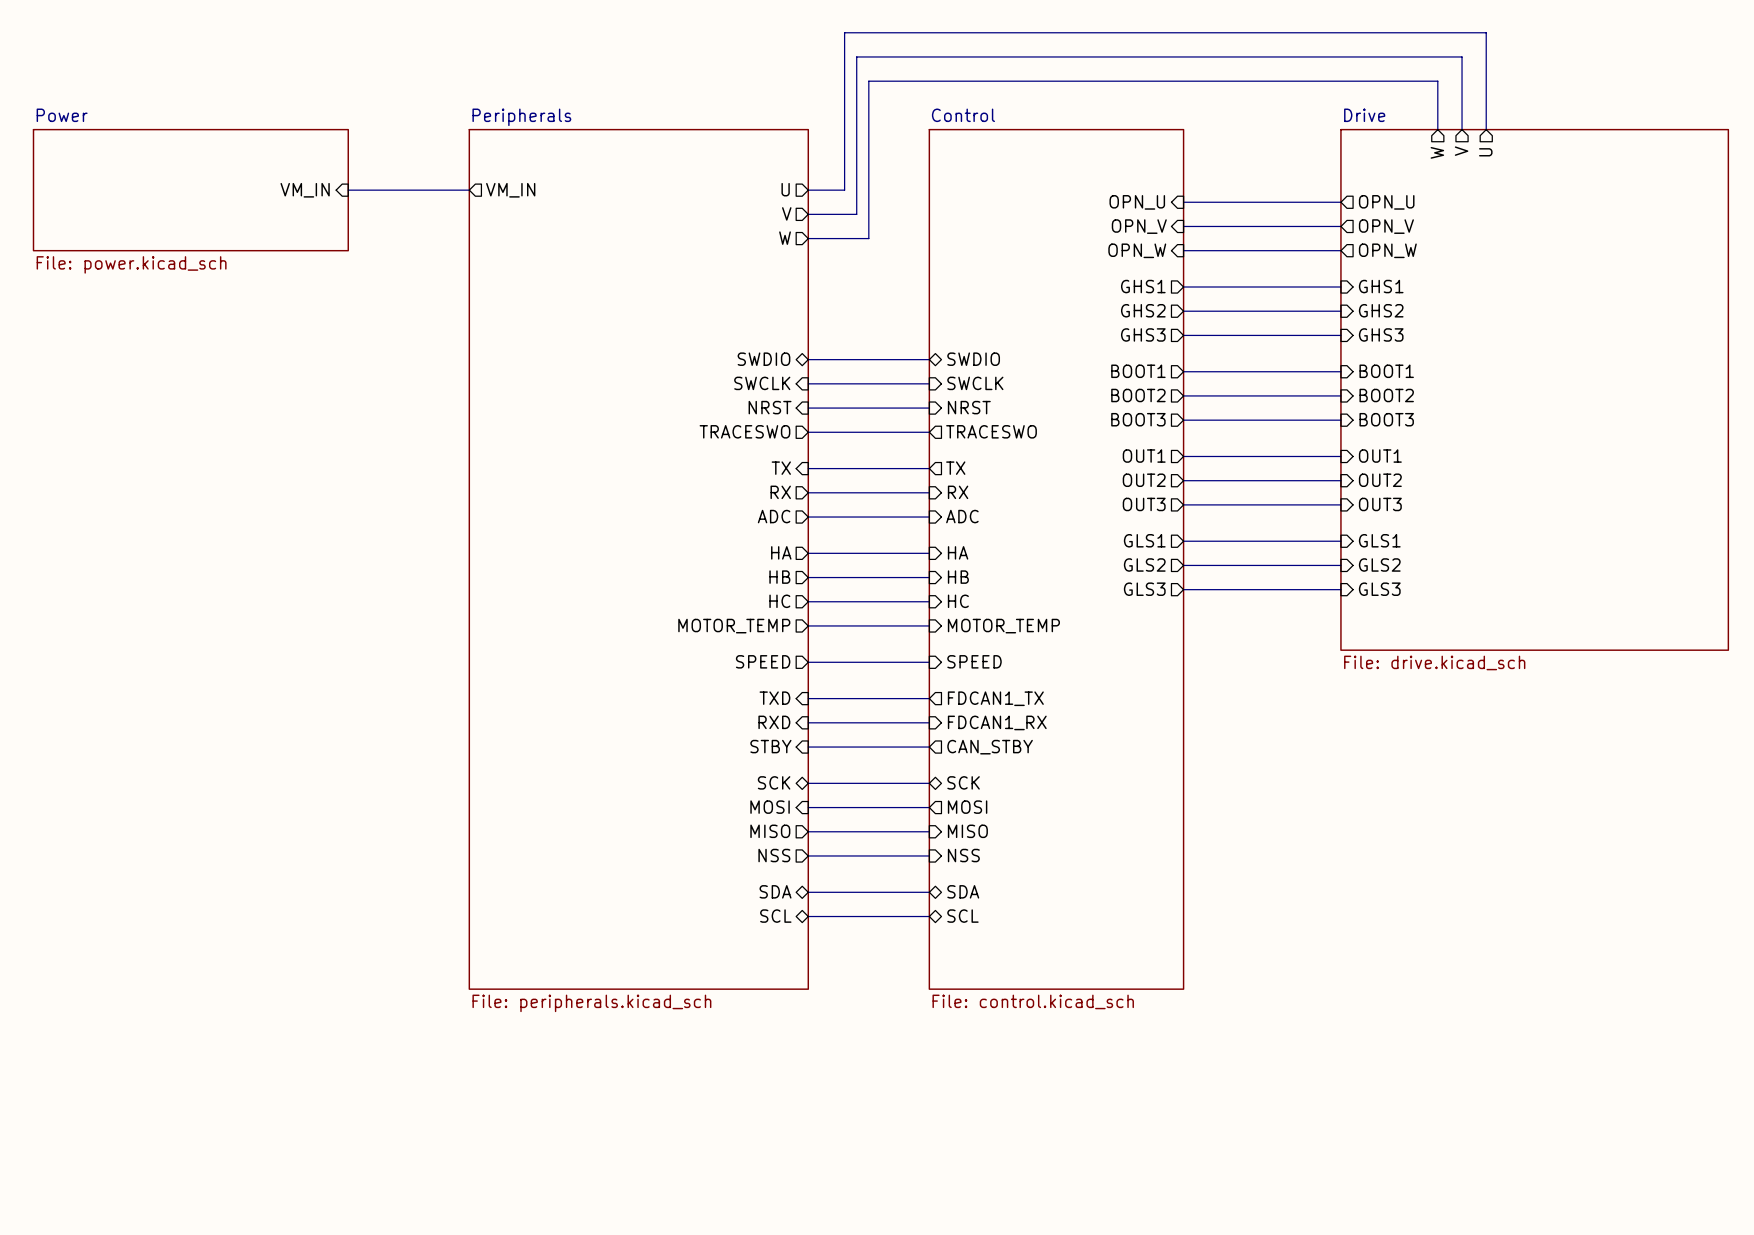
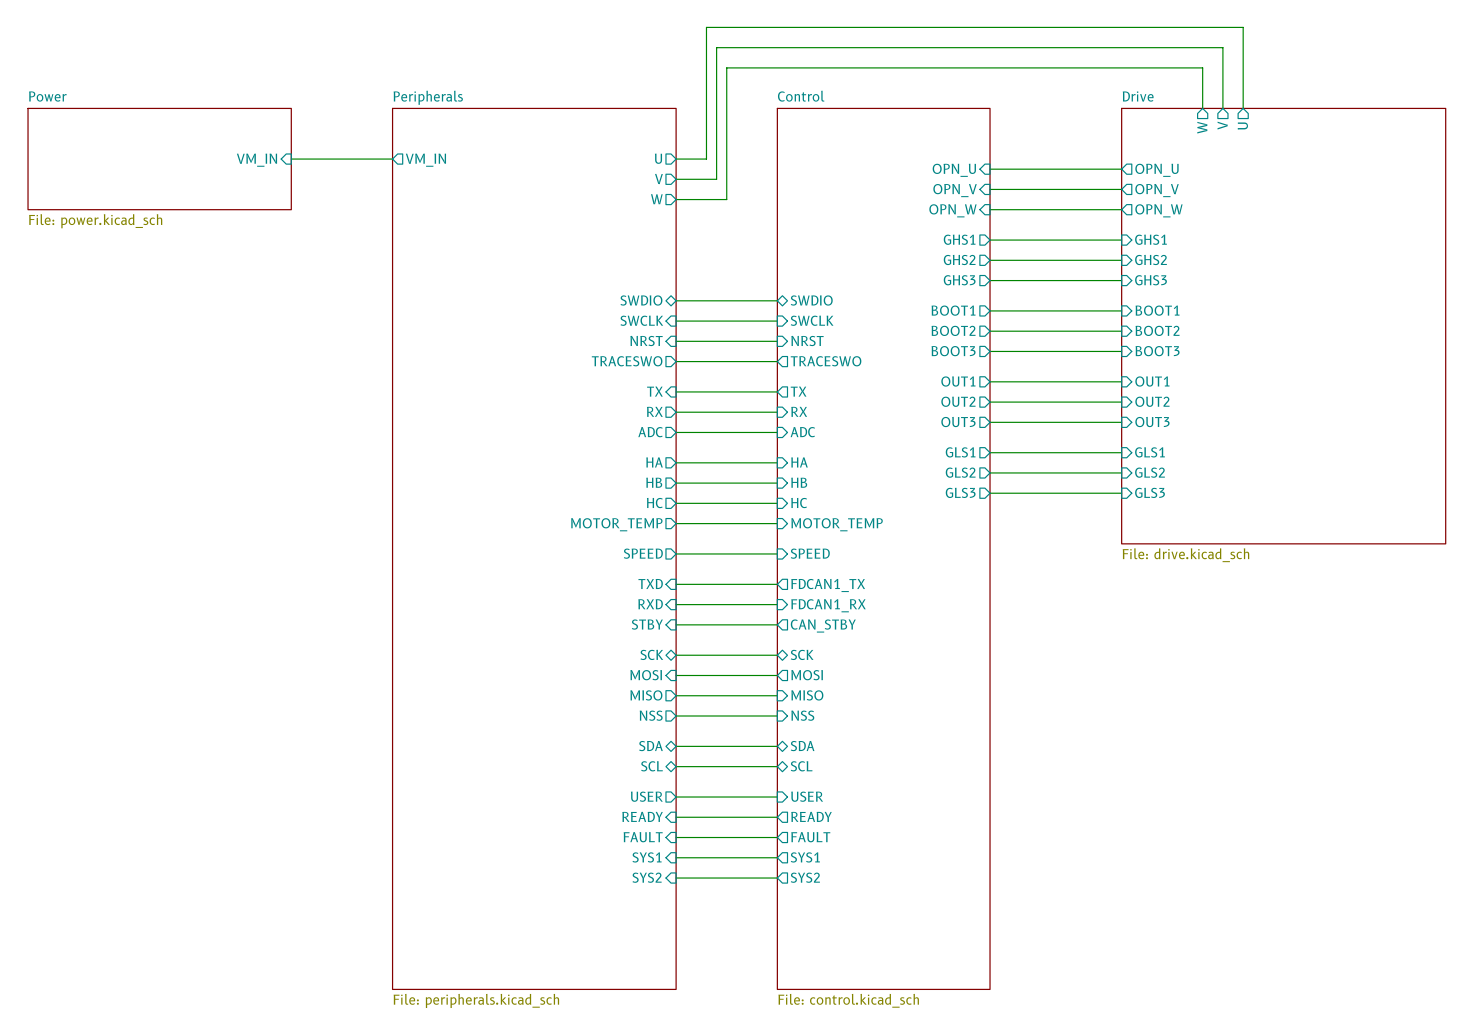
sheet Peripherals: File: peripherals.kicad_sch (638, 559) -> none
sheet Control: File: control.kicad_sch (1056, 559) -> none
sheet Peripherals: none -> File: peripherals.kicad_sch (534, 548)
sheet Control: none -> File: control.kicad_sch (883, 548)
sheet pin: none -> USER (646, 796)
wire: none -> (676, 797) (777, 797)
sheet pin: none -> USER (807, 796)
sheet pin: none -> READY (642, 816)
sheet pin: none -> READY (811, 816)
wire: none -> (676, 817) (777, 817)
sheet pin: none -> FAULT (643, 837)
sheet pin: none -> FAULT (810, 837)
wire: none -> (676, 837) (777, 837)
sheet pin: none -> SYS1 (647, 857)
wire: none -> (676, 857) (777, 857)
sheet pin: none -> SYS1 (805, 857)
sheet pin: none -> SYS2 (647, 877)
wire: none -> (676, 878) (777, 878)
sheet pin: none -> SYS2 (805, 877)

